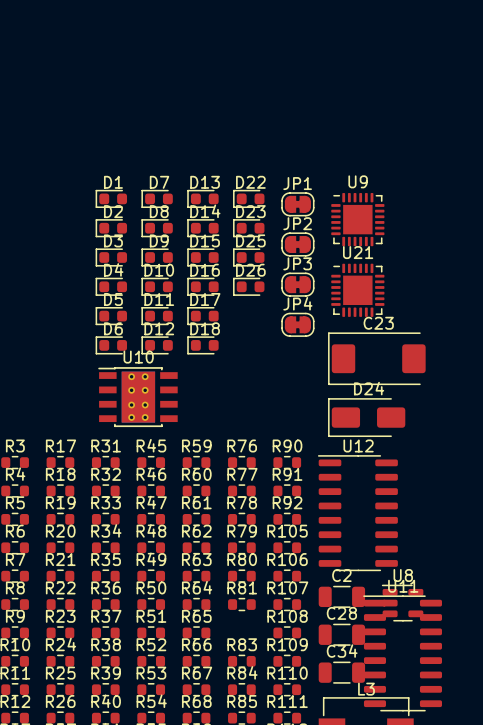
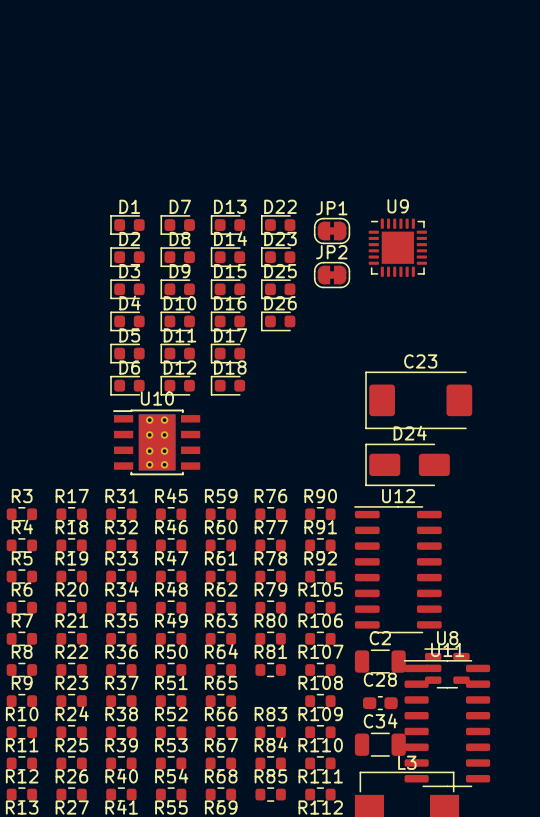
JP3: (297, 284) -> none
U21: (357, 290) -> none
JP4: (297, 324) -> none
C28 footprint: [318, 623, 366, 646] -> [362, 696, 398, 711]

